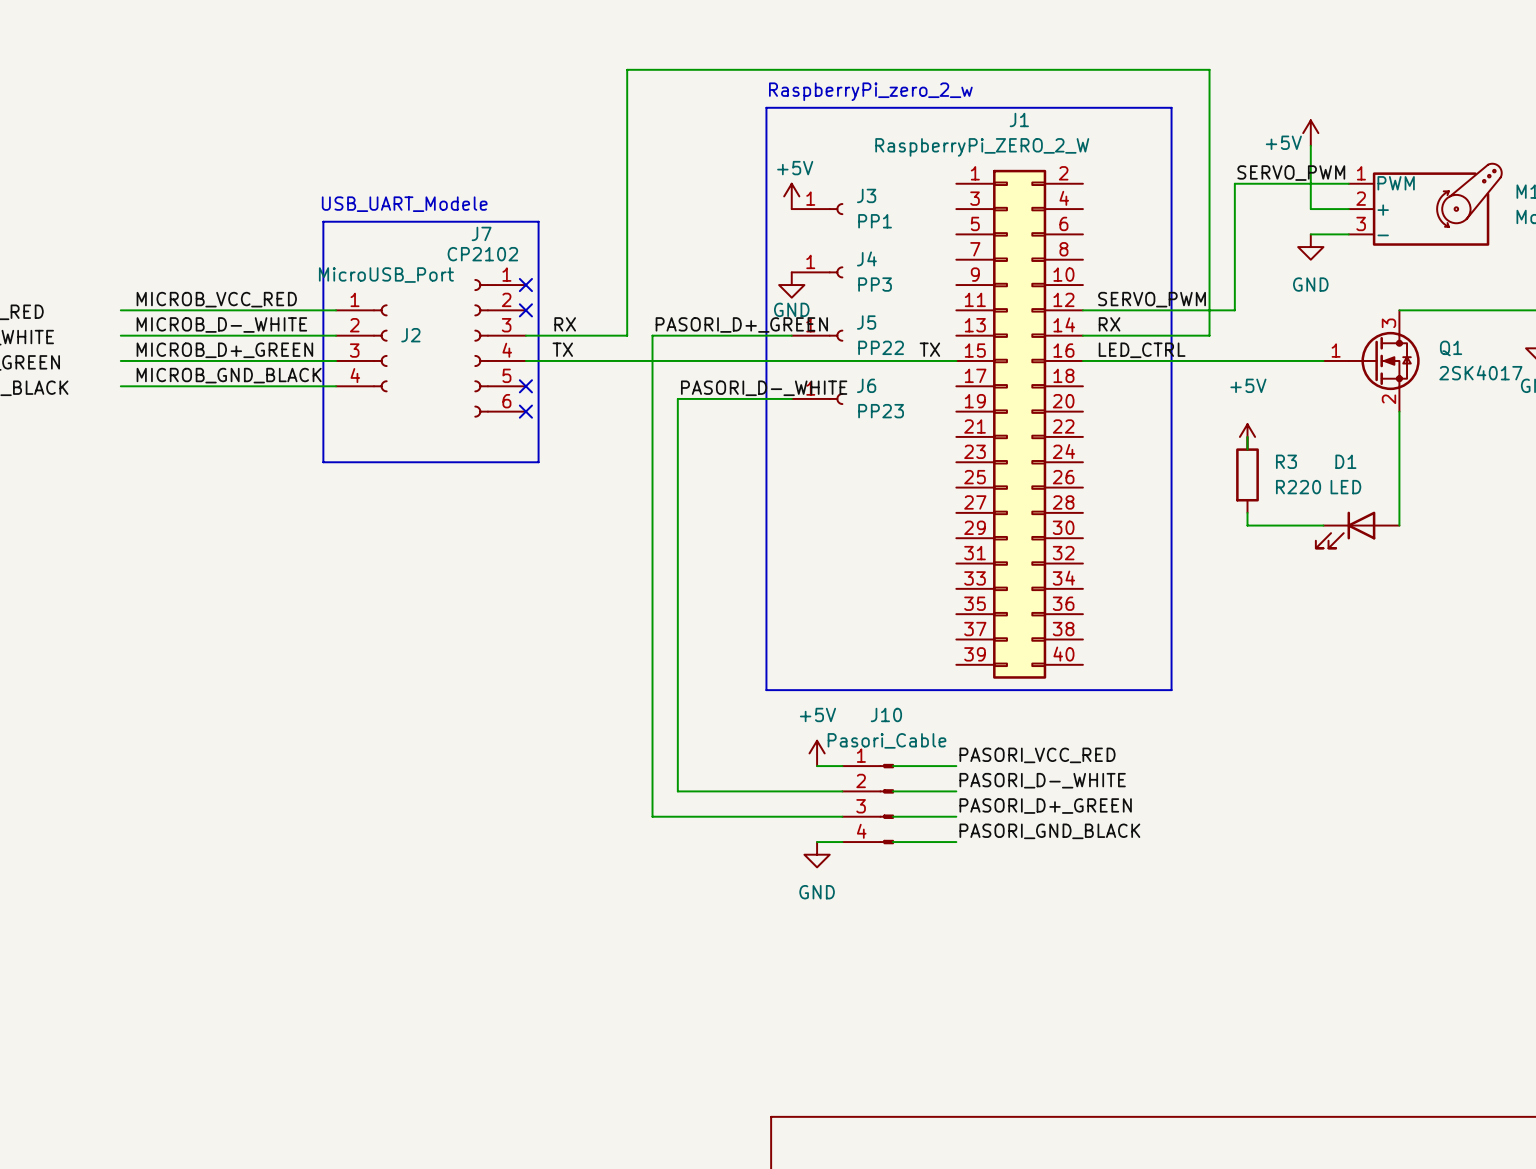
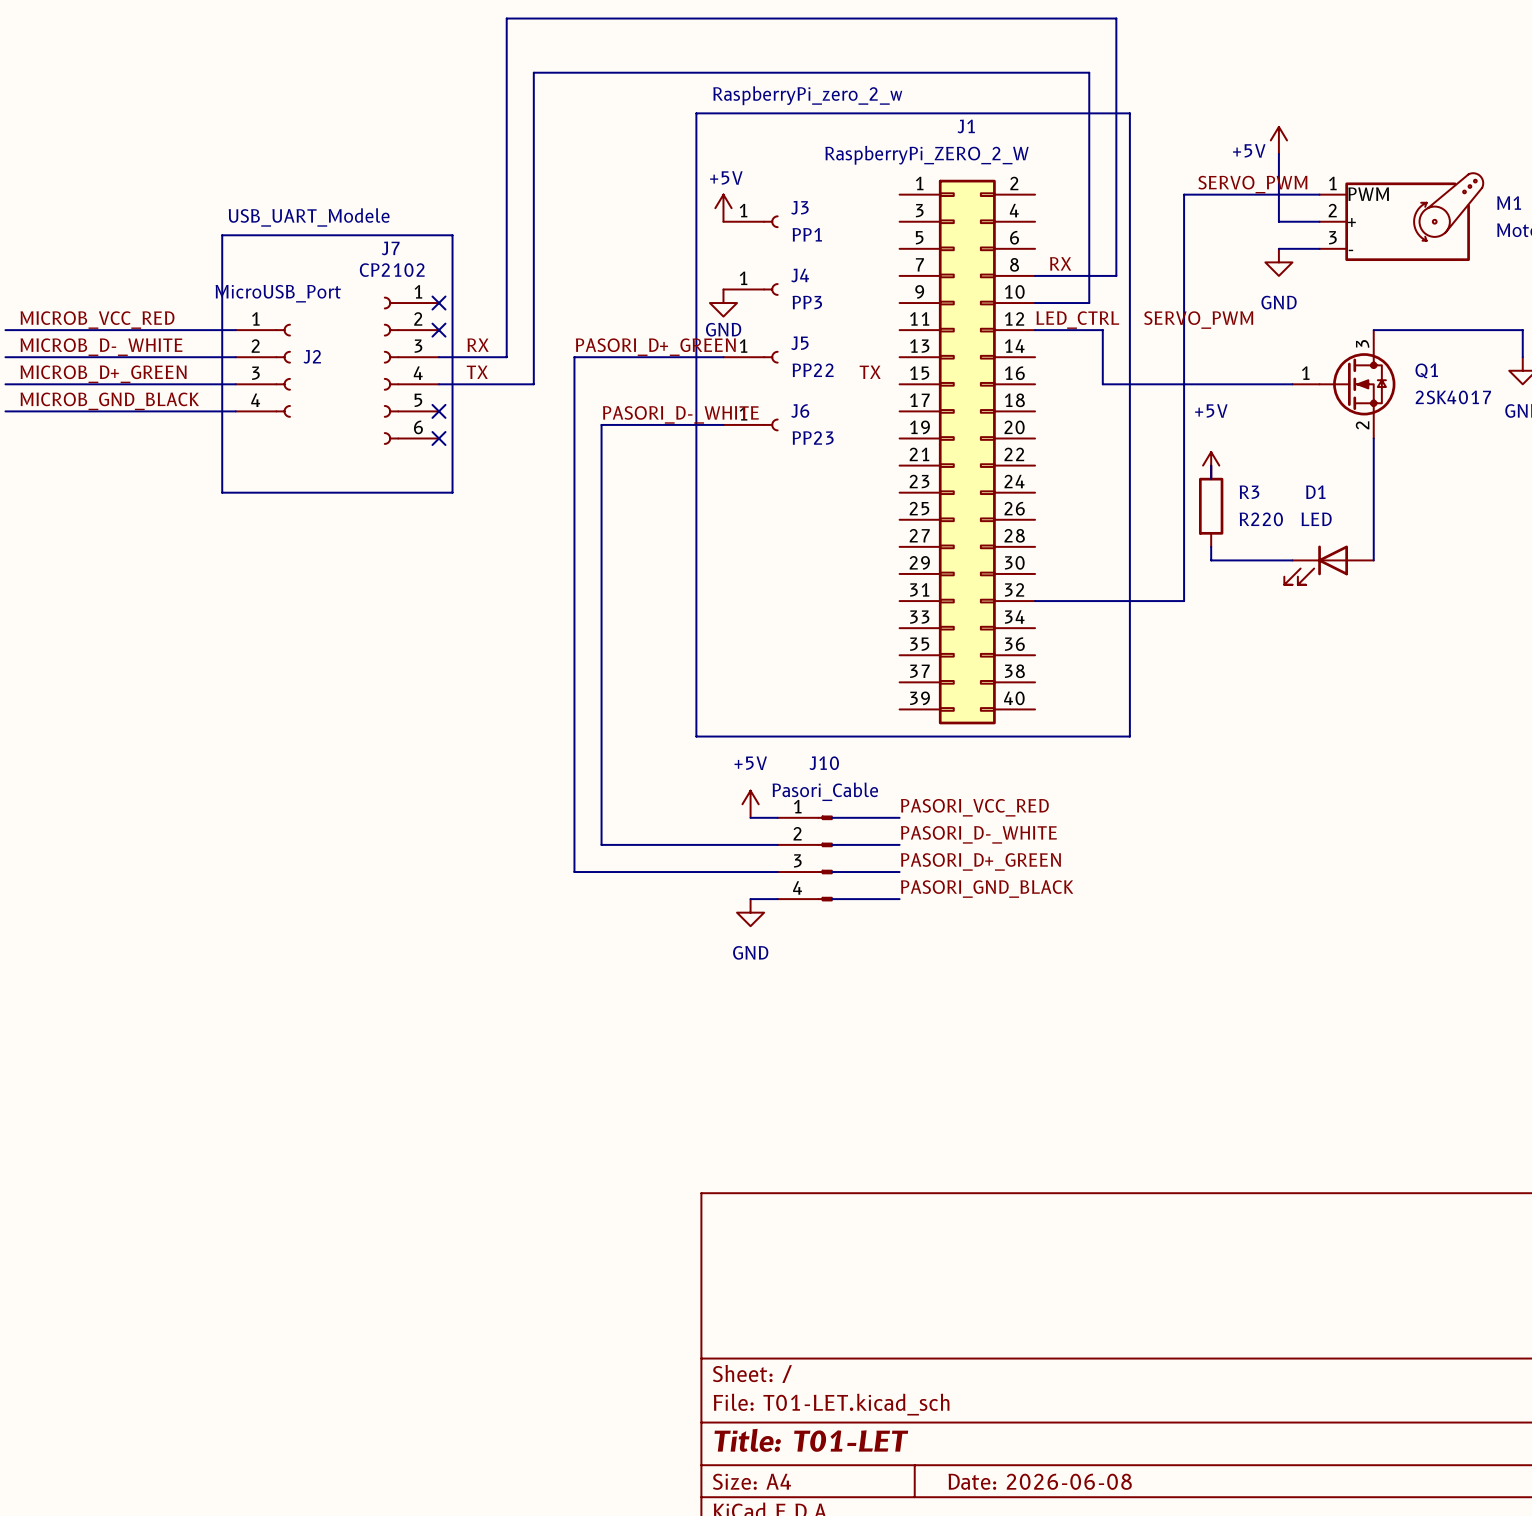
wire: (627, 69) (627, 335) (589, 335) -> (547, 72) (533, 72) (533, 384)
wire: (1133, 69) (1209, 69) (1209, 335) (1082, 335) -> (1089, 72) (1089, 303) (1035, 303)
wire: (1234, 183) (1234, 310) (1146, 310) -> (1197, 194) (1184, 194) (1184, 601) (1035, 601)
wire: none -> (1035, 275) (1116, 275) (1116, 18) (506, 18) (506, 357)
label position: SERVO_PWM (1152, 299) -> SERVO_PWM (1198, 320)
label position: RX (1109, 324) -> RX (1060, 263)
label position: LED_CTRL (1142, 350) -> LED_CTRL (1077, 320)
wire: (614, 360) (956, 360) -> none
wire: (1082, 360) (1146, 360) -> (1102, 330) (1102, 384)

